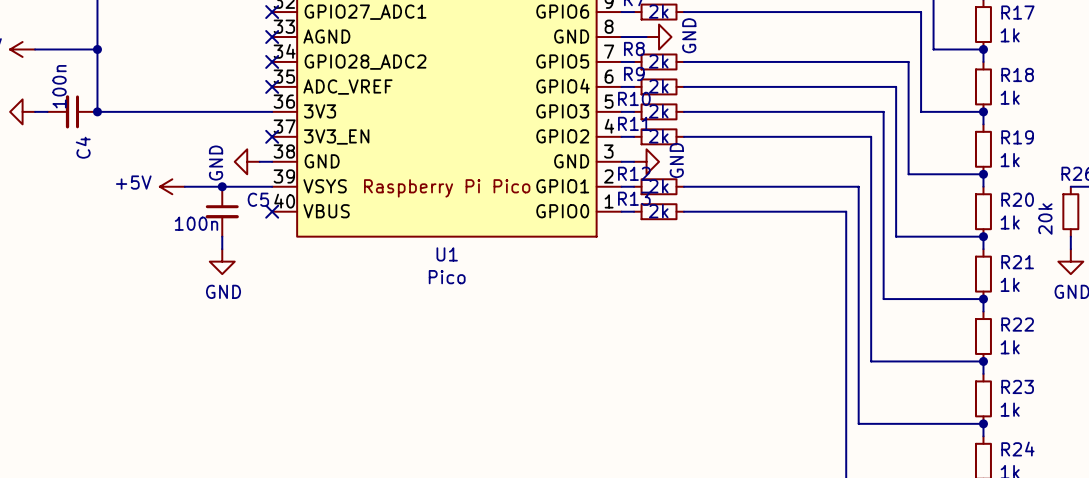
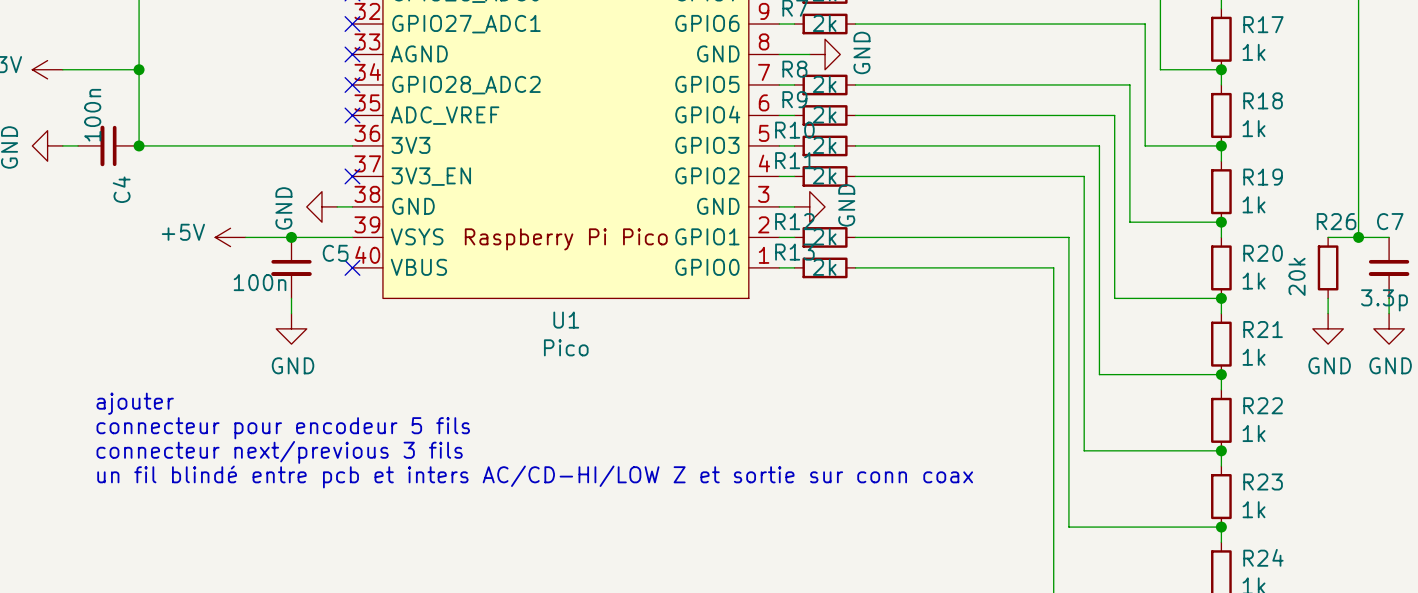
text: none -> ajouter (135, 403)
text: none -> connecteur pour encodeur 5 fils (283, 428)
text: none -> connecteur next/previous 3 fils (279, 452)
text: none -> un fil blindé entre pcb et inters AC/CD-HI/LOW Z et sortie sur conn coax (535, 476)

